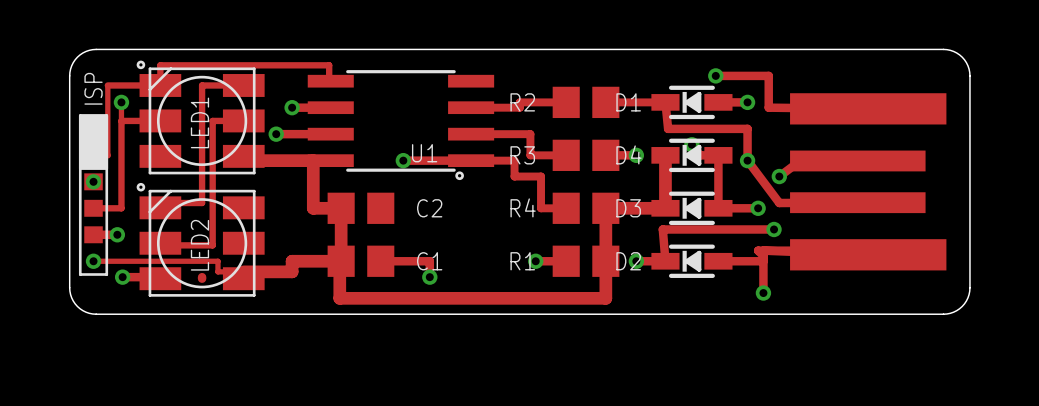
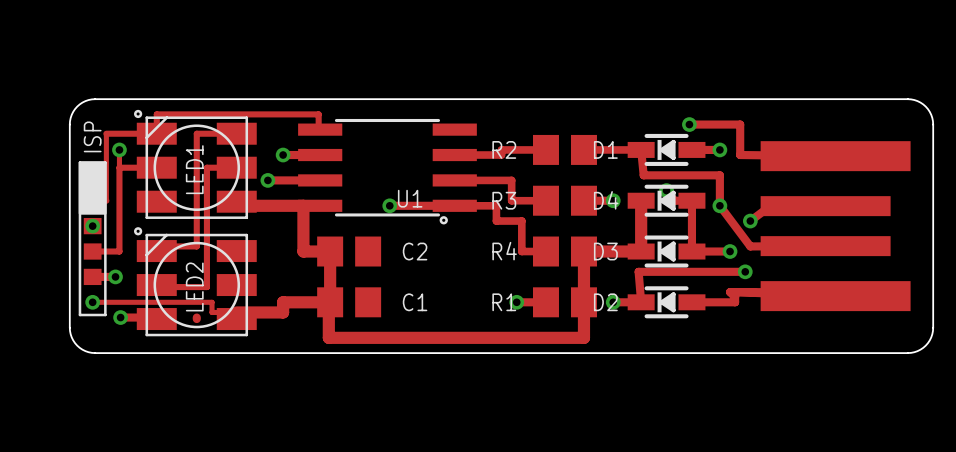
track: (380, 261) (429, 261) (429, 277) -> none
track: (763, 261) (763, 293) -> none
via: (429, 277) -> none
via: (763, 293) -> none

